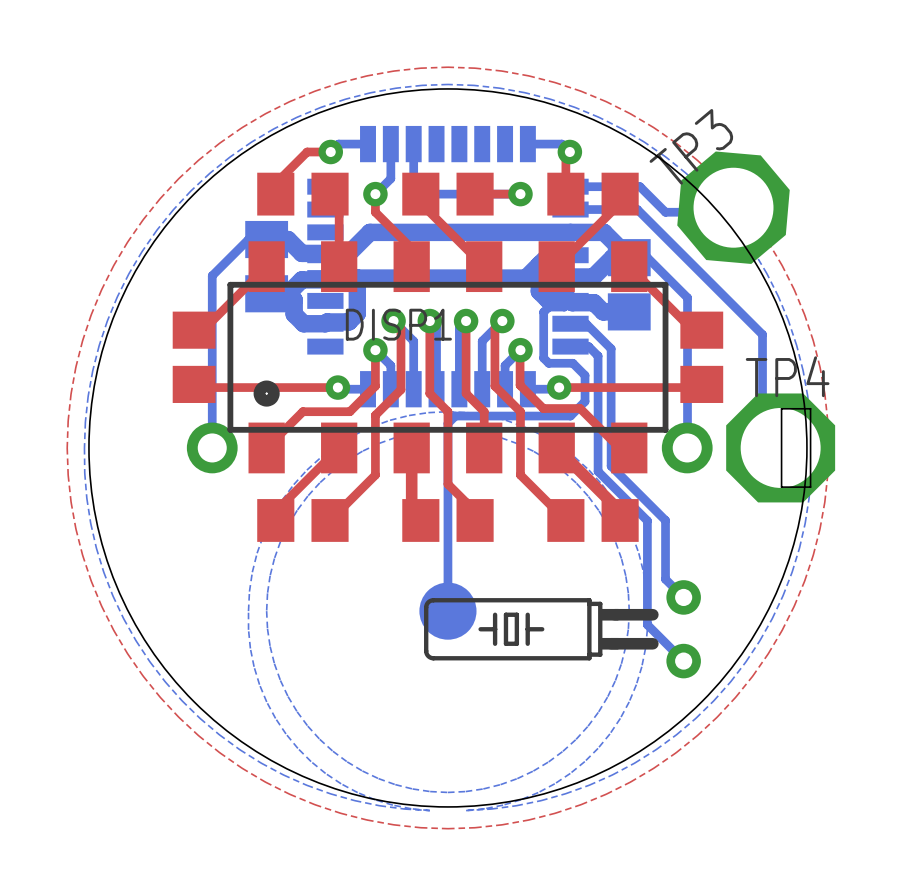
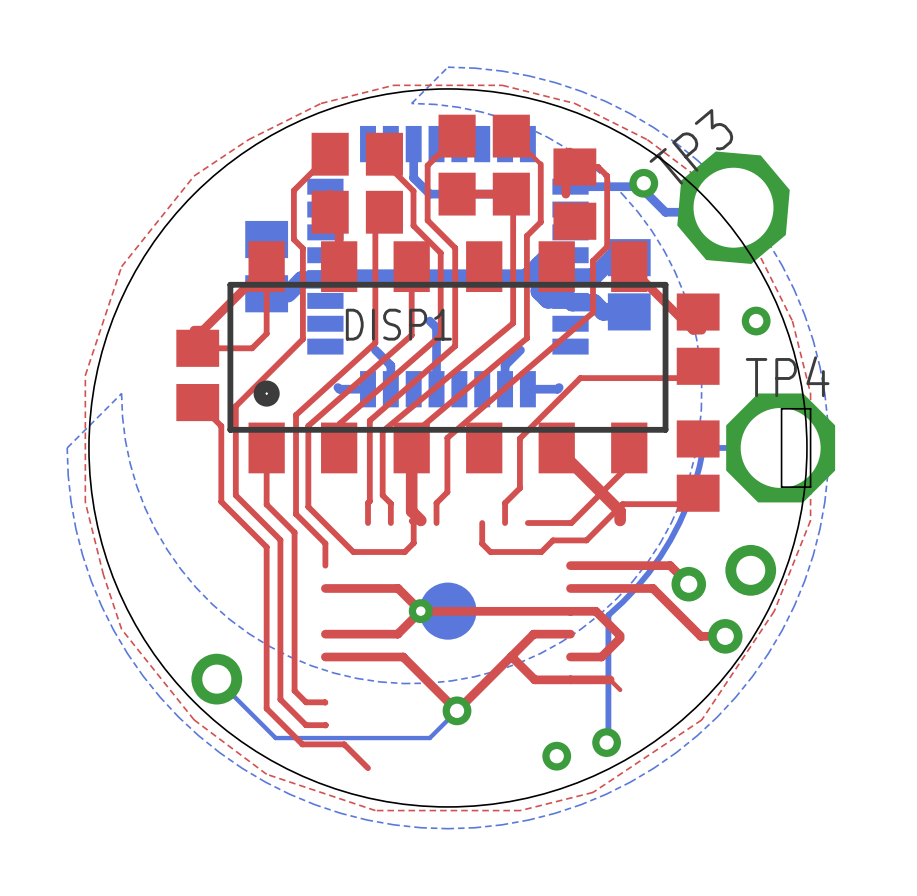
top zone outline: (447, 67) (420, 68) (367, 75) (314, 91) (289, 101) (242, 127) (198, 160) (178, 178) (160, 198) (127, 242) (113, 265) (91, 314) (75, 367) (71, 393) (67, 447) (68, 475) (75, 528) (91, 581) (101, 606) (127, 653) (160, 697) (178, 717) (219, 752) (242, 768) (265, 782) (314, 804) (367, 820) (393, 824) (447, 828) (475, 827) (528, 820) (555, 813) (606, 794) (630, 782) (676, 752) (717, 717) (752, 676) (768, 653) (782, 630) (804, 581) (820, 528) (824, 502) (828, 447) (824, 393) (820, 367) (813, 340) (794, 289) (768, 242) (735, 198) (717, 178) (697, 160) (653, 127) (606, 101) (555, 82) (528, 75) (475, 68) (447, 67) -> (393, 85) (321, 103) (248, 139) (194, 175) (121, 266) (85, 375) (85, 502) (103, 574) (121, 629) (194, 719) (266, 774) (375, 810) (520, 810) (593, 792) (701, 719) (774, 611) (810, 520) (810, 393) (792, 321) (756, 248) (719, 194) (647, 139) (574, 103) (502, 85) (393, 85)
bottom zone outline: (447, 84) (422, 85) (370, 92) (320, 107) (273, 128) (251, 142) (230, 156) (190, 190) (156, 230) (142, 251) (117, 296) (107, 320) (92, 370) (85, 422) (84, 447) (84, 473) (90, 523) (96, 548) (112, 595) (136, 640) (165, 681) (182, 700) (219, 734) (239, 749) (261, 763) (306, 785) (354, 800) (404, 809) (429, 810) (411, 808) (374, 799) (341, 783) (325, 773) (311, 761) (285, 733) (275, 718) (259, 684) (254, 666) (248, 629) (249, 591) (257, 553) (272, 517) (282, 500) (293, 484) (321, 456) (353, 435) (371, 426) (409, 415) (447, 411) (486, 415) (505, 420) (541, 435) (574, 456) (588, 470) (613, 500) (632, 534) (643, 572) (646, 591) (647, 629) (641, 666) (636, 684) (620, 718) (609, 733) (584, 761) (554, 783) (520, 799) (484, 808) (466, 810) (516, 805) (565, 793) (589, 785) (634, 763) (656, 749) (695, 718) (730, 681) (746, 661) (759, 640) (783, 595) (799, 548) (805, 523) (811, 473) (810, 422) (807, 396) (803, 370) (788, 320) (778, 296) (753, 251) (722, 209) (704, 190) (665, 156) (622, 128) (598, 117) (574, 107) (525, 92) (473, 85) (447, 84) -> (447, 67) (411, 103) (458, 107) (504, 118) (547, 137) (587, 162) (622, 194) (651, 230) (674, 271) (691, 315) (700, 362) (701, 385) (699, 432) (695, 455) (681, 500) (660, 543) (647, 562) (616, 598) (580, 629) (561, 642) (540, 653) (496, 670) (450, 681) (403, 683) (380, 681) (334, 673) (289, 656) (248, 633) (212, 604) (180, 569) (155, 529) (136, 486) (125, 440) (121, 393) (67, 447) (71, 502) (75, 528) (91, 581) (101, 606) (127, 653) (143, 676) (178, 717) (219, 752) (265, 782) (289, 794) (340, 813) (367, 820) (393, 824) (447, 828) (502, 824) (528, 820) (581, 804) (606, 794) (653, 768) (676, 752) (717, 717) (735, 697) (768, 653) (794, 606) (804, 581) (820, 528) (827, 475) (828, 447) (827, 420) (820, 367) (813, 340) (794, 289) (768, 242) (752, 219) (717, 178) (697, 160) (653, 127) (630, 113) (581, 91) (528, 75) (475, 68) (447, 67)
top track: none -> (457, 136) (427, 165) (427, 220) (455, 248) (455, 346) (369, 420) (368, 523)
part: none -> (484, 136)
top track: none -> (511, 136) (540, 164) (540, 222) (526, 236) (526, 338) (411, 435) (411, 447)
bottom track: (368, 144) (338, 144) (330, 152) -> none
bottom track: (390, 144) (390, 178) (375, 194) -> none
bottom track: (527, 144) (561, 144) (569, 152) -> none
top track: (330, 152) (307, 152) (275, 183) (275, 194) -> none
via: (330, 152) -> none
via: (569, 152) -> none
top track: none -> (330, 154) (293, 190) (293, 239) (302, 248) (302, 339) (235, 406) (235, 495) (280, 539) (280, 699) (306, 725) (325, 725)
part: none -> (357, 154)
top track: none -> (384, 154) (384, 162) (413, 191) (413, 225) (440, 252) (440, 335) (339, 423) (339, 465)
top track: none -> (574, 166) (598, 166) (607, 176) (607, 246) (593, 260) (593, 312) (447, 437) (447, 492) (436, 503) (436, 523)
via: none -> (643, 183)
part: (302, 194) -> none
top track: (375, 194) (375, 212) (411, 248) (411, 266) -> none
via: (375, 194) -> none
top track: (420, 194) (420, 203) (484, 266) -> none
part: (447, 194) -> none
part: none -> (484, 194)
top track: none -> (511, 194) (513, 195) (513, 323) (382, 431) (382, 495) (390, 503) (390, 523)
via: (520, 194) -> none
part rotation: 0° (593, 194) -> 90° clockwise (574, 194)
top track: (620, 194) (620, 203) (556, 266) -> none
bottom track: (570, 209) (637, 209) (762, 334) (762, 429) (780, 447) -> (606, 742) (608, 740) (608, 615) (636, 587) (670, 539) (687, 504) (703, 447) (780, 447)
part: none -> (357, 212)
top track: none -> (384, 212) (375, 221) (375, 342) (296, 415) (296, 514) (325, 543) (325, 565)
bottom track: (357, 278) (357, 313) (348, 321) (303, 323) (294, 314) (294, 300) (287, 293) (266, 293) -> none
top track: none -> (266, 283) (266, 333) (252, 348) (197, 348)
top track: none -> (411, 283) (411, 335) (308, 425) (308, 506) (353, 552) (404, 552) (413, 543) (413, 523) (411, 521)
bottom track: (570, 300) (564, 307) (548, 307) (543, 312) (543, 358) (548, 363) (572, 363) (585, 375) (585, 401) (570, 416) (455, 416) (447, 423) (447, 611) -> none
bottom track: (393, 321) (413, 341) (413, 389) -> none
top track: (393, 321) (400, 328) (400, 389) (375, 415) (375, 475) (330, 520) -> none
via: (393, 321) -> none
top track: (429, 321) (429, 393) (447, 411) (447, 484) (466, 502) (466, 511) (475, 520) -> none
via: (429, 321) -> none
bottom track: (466, 321) (459, 327) (459, 389) -> none
top track: (466, 321) (466, 393) (484, 411) (484, 447) -> none
via: (466, 321) -> none
bottom track: (502, 321) (482, 341) (482, 389) -> none
top track: (502, 321) (494, 328) (494, 386) (520, 411) (520, 475) (565, 520) -> none
via: (502, 321) -> none
via: none -> (756, 321)
bottom track: (570, 323) (586, 323) (611, 348) (611, 466) (665, 520) (665, 579) (683, 597) -> none
bottom track: (570, 346) (588, 346) (598, 356) (598, 471) (647, 520) (647, 624) (683, 661) -> none
top track: (375, 350) (375, 386) (349, 411) (302, 411) (266, 447) -> none
via: (375, 350) -> none
top track: (520, 350) (520, 385) (543, 408) (580, 408) (619, 447) (629, 447) -> none
via: (520, 350) -> none
part position: (194, 357) -> (197, 375)
part position: (701, 357) -> (698, 339)
top track: none -> (698, 366) (686, 378) (580, 378) (519, 438) (519, 488) (505, 503) (505, 523)
top track: (194, 384) (197, 387) (337, 387) -> none
top track: (701, 384) (698, 387) (559, 387) -> none
via: (337, 387) -> none
via: (559, 387) -> none
top track: none -> (197, 402) (221, 426) (221, 501) (266, 547) (266, 708) (302, 744) (344, 744) (368, 768)
part footprint: [661, 422, 713, 474] -> [676, 420, 720, 512]
bottom zone outline: (447, 429) (412, 433) (378, 443) (347, 460) (319, 482) (297, 510) (280, 541) (270, 575) (266, 611) (270, 646) (280, 680) (297, 711) (319, 739) (347, 761) (378, 778) (412, 788) (447, 792) (483, 788) (517, 778) (548, 761) (576, 739) (598, 711) (615, 680) (625, 646) (629, 611) (625, 575) (615, 541) (598, 510) (576, 482) (548, 460) (517, 443) (483, 433) (447, 429) -> none
part position: (212, 447) -> (216, 679)
top track: (339, 447) (275, 511) (275, 520) -> none
bottom track: (687, 447) (687, 297) (647, 257) (629, 257) (603, 232) (369, 232) (348, 253) (301, 253) (287, 239) (248, 239) (212, 275) (212, 447) -> none
top track: none -> (266, 465) (266, 504) (294, 532) (294, 690) (306, 702) (325, 702)
top track: none -> (629, 465) (571, 523) (527, 523)
top track: none -> (698, 493) (692, 493) (681, 504) (622, 504) (586, 540) (553, 540) (541, 552) (490, 552) (482, 543) (482, 523)
part: (302, 520) -> none
part: (447, 520) -> none
part: (593, 520) -> none
top track: none -> (570, 565) (670, 565) (688, 584)
part: none -> (750, 570)
top track: none -> (325, 588) (398, 588) (420, 611) (595, 611) (620, 635) (620, 638) (601, 657) (570, 657)
top track: none -> (570, 588) (652, 588) (700, 636) (725, 636)
top track: none -> (420, 611) (397, 634) (325, 634)
via: none -> (420, 611)
part side: top (562, 629) -> bottom (707, 610)
top track: none -> (570, 634) (533, 634) (457, 710) (403, 657) (325, 657)
top track: none -> (511, 656) (534, 679) (610, 679) (620, 689)
bottom track: none -> (216, 679) (275, 738) (429, 738) (457, 710)
via: none -> (457, 710)
via: none -> (606, 742)
via: none -> (556, 756)

